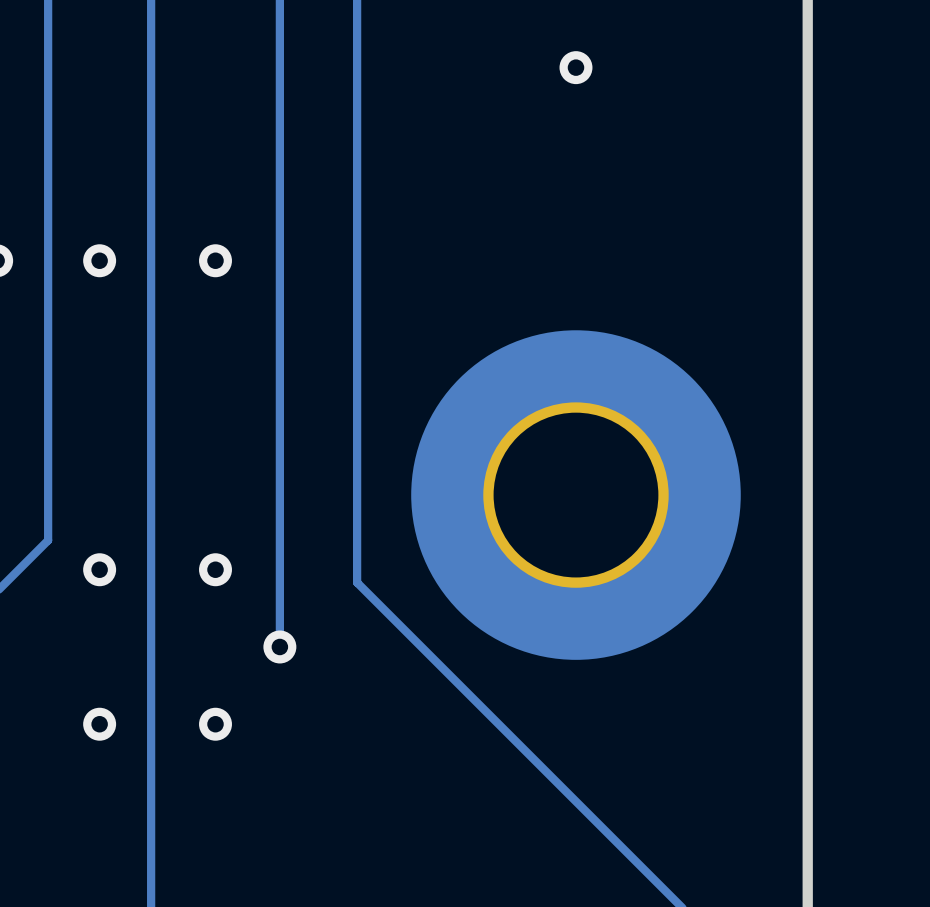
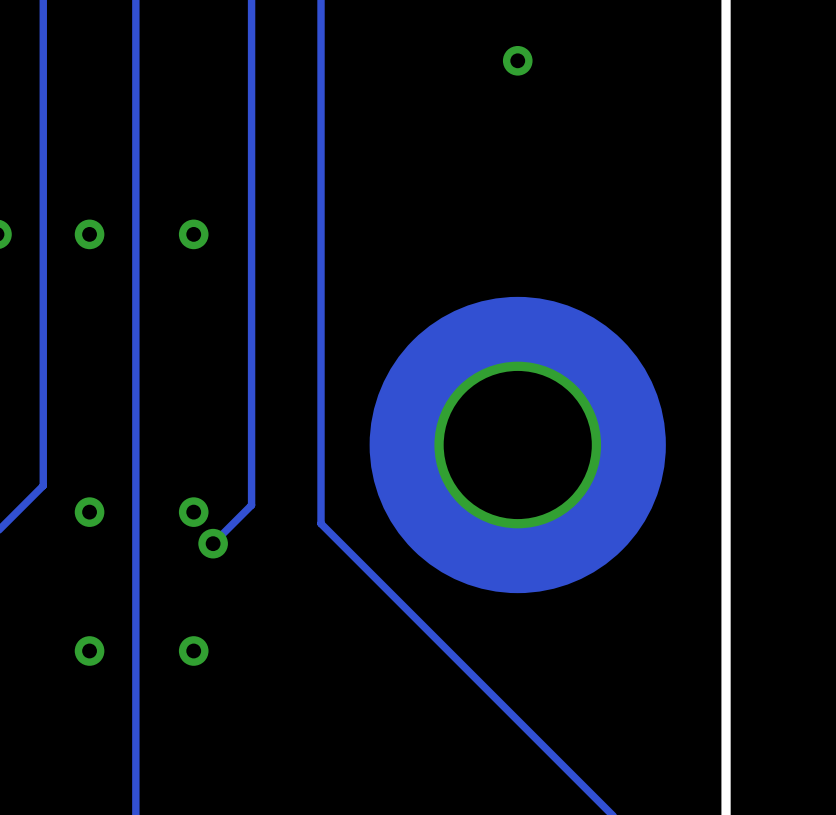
track: (279, 562) (279, 646) -> (251, 505) (213, 543)
via position: (279, 646) -> (213, 543)

